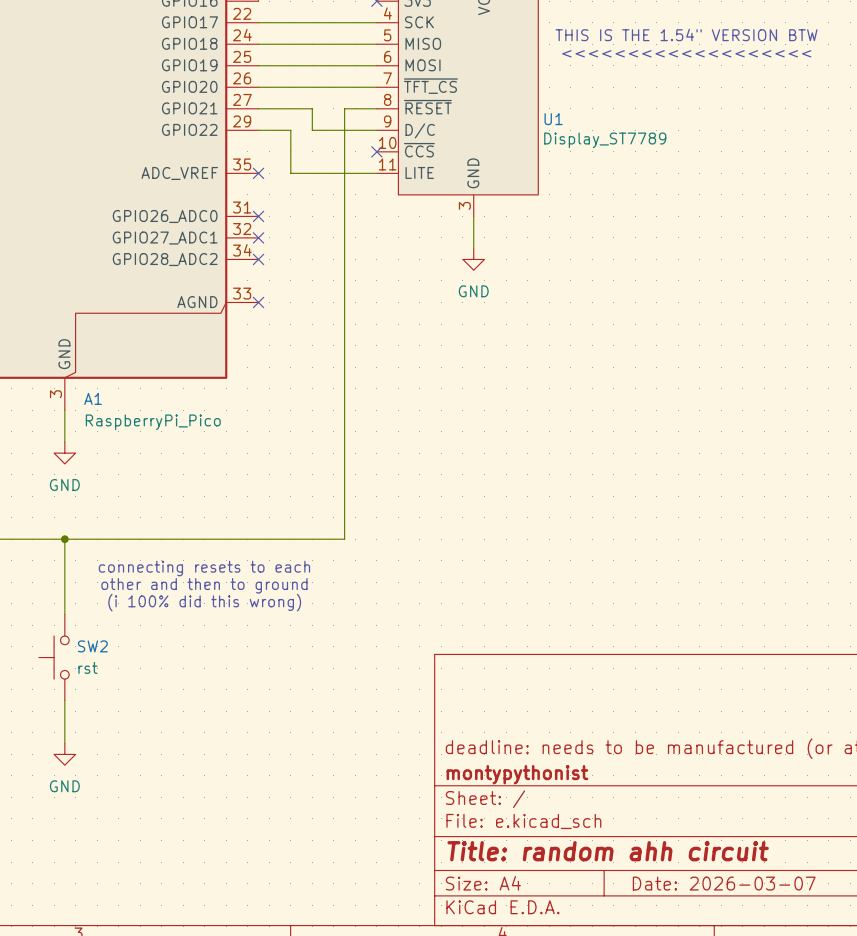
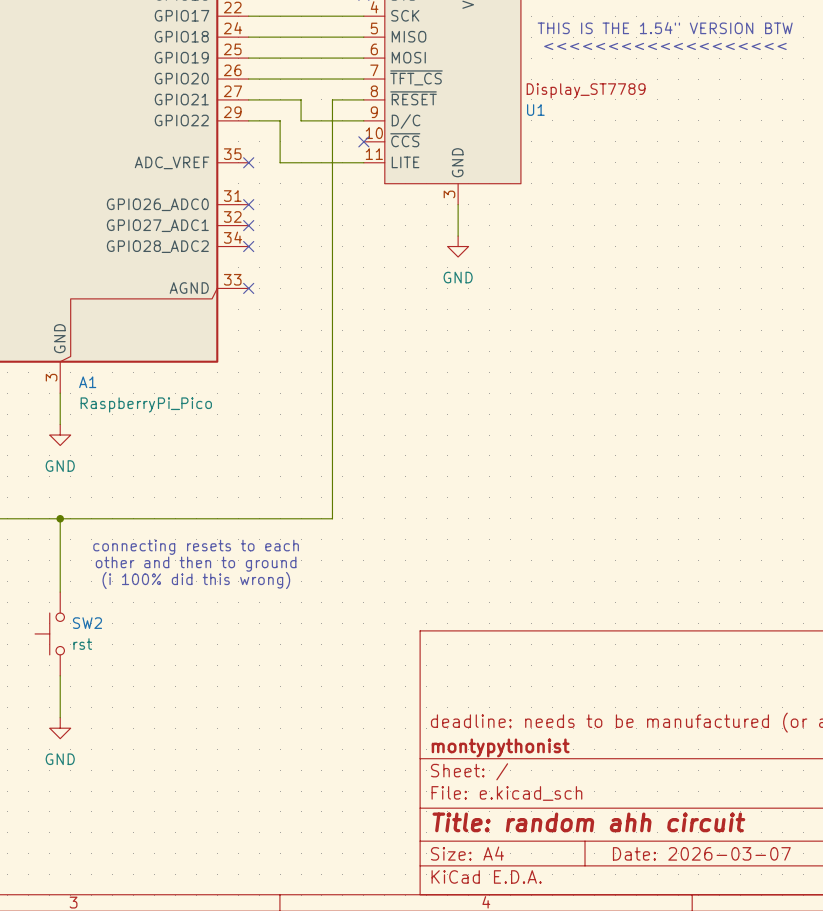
U1 text: none -> Display_ST7789 (586, 90)
U1 value: Display_ST7789 (605, 140) -> none

